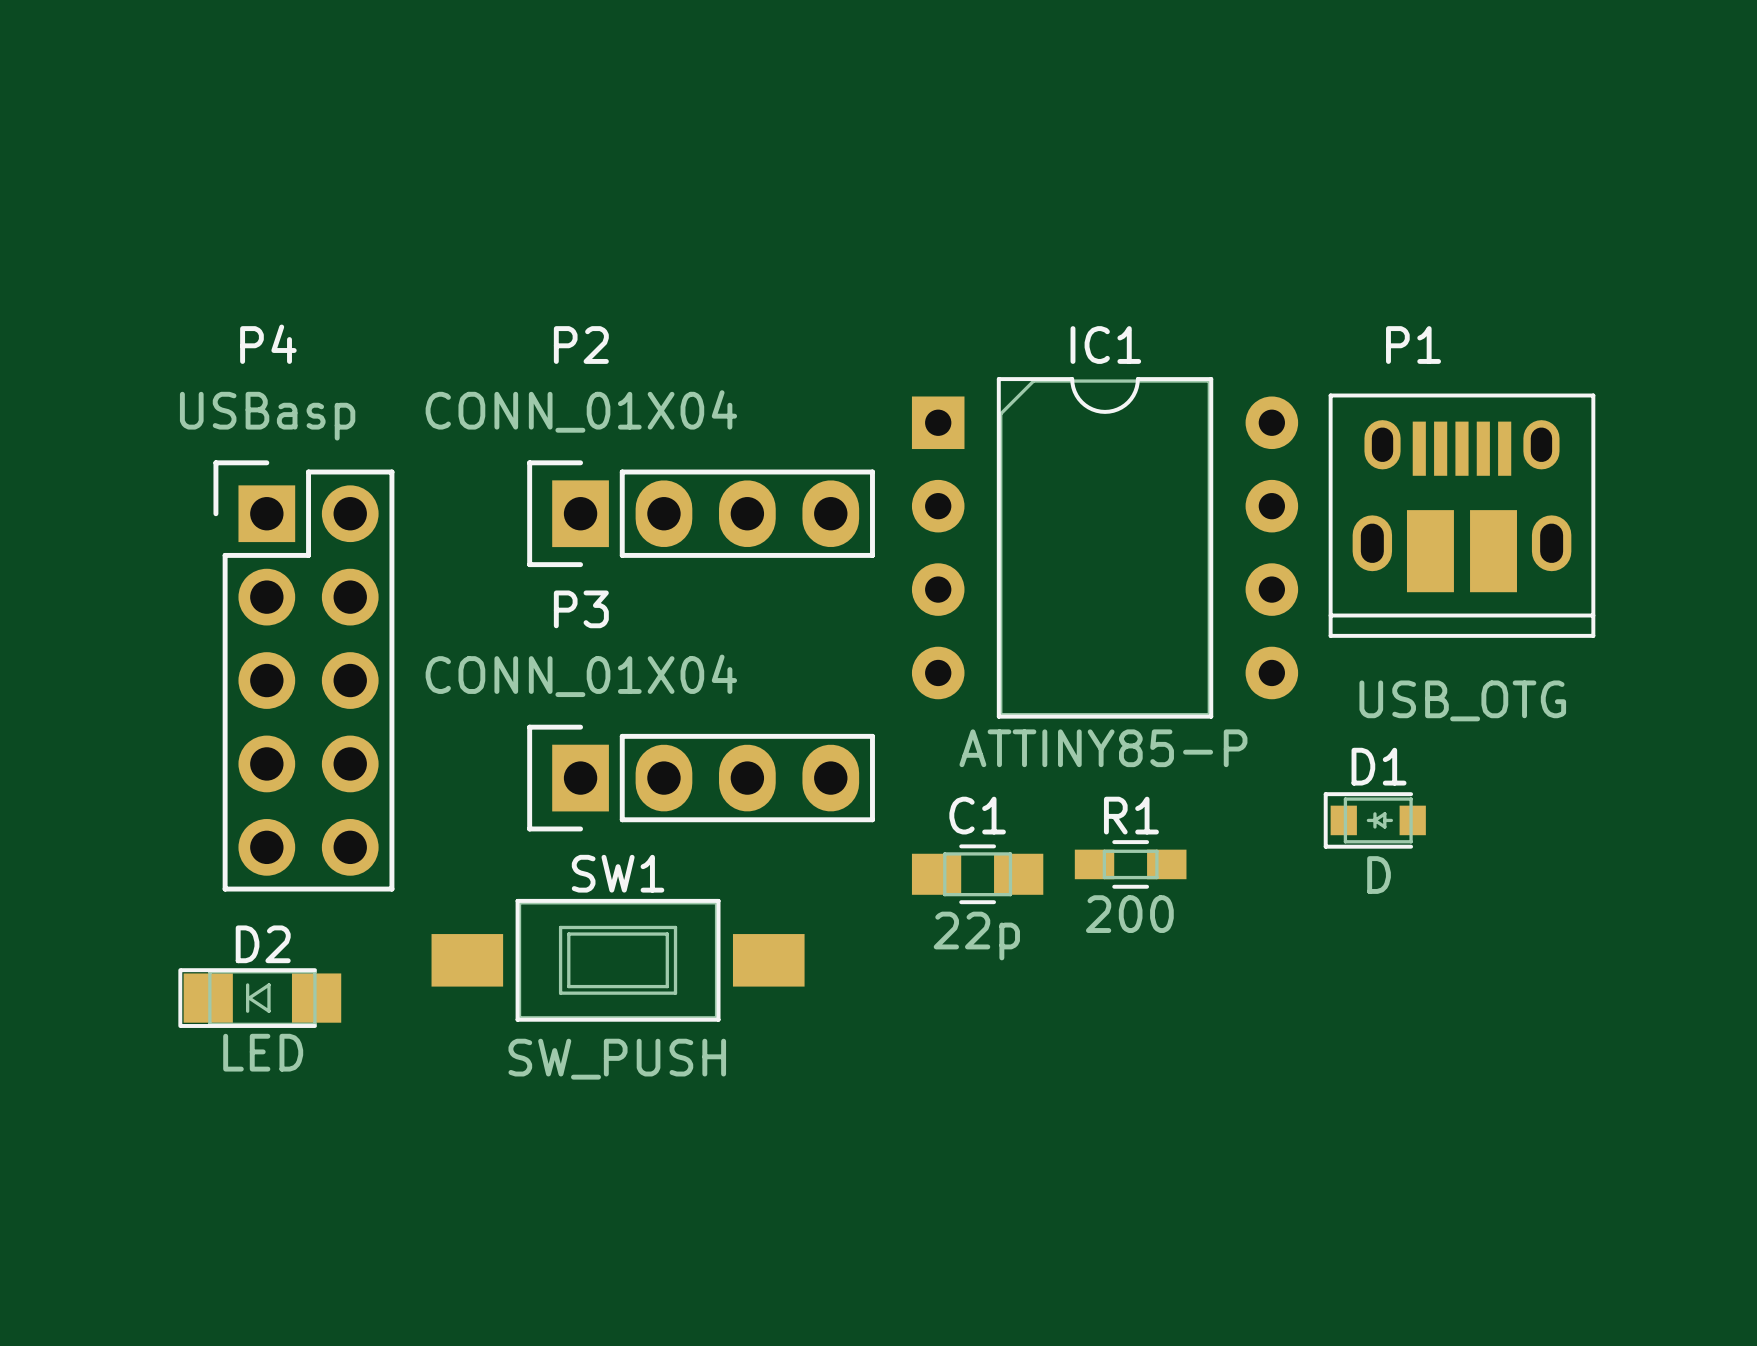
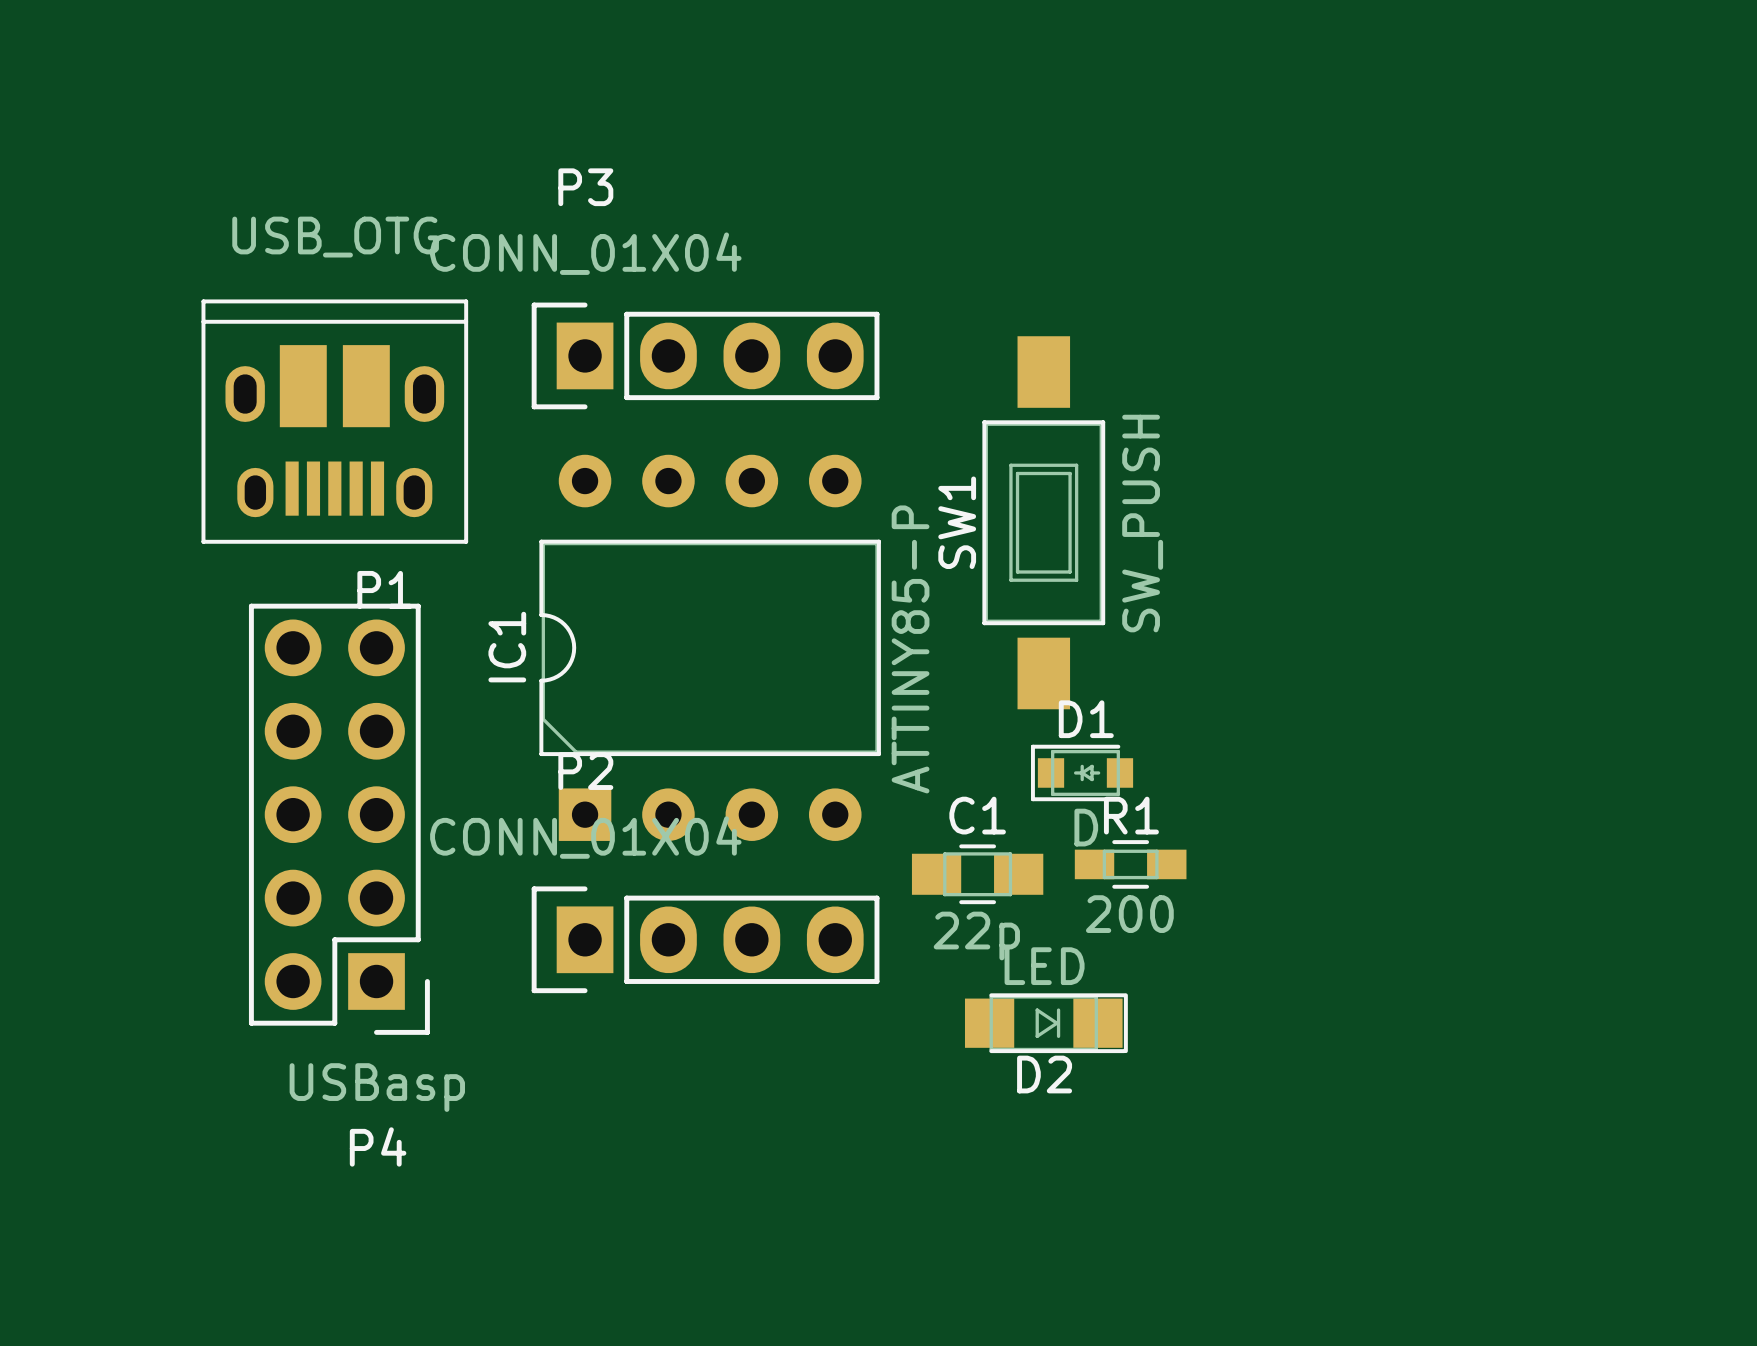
P2 position: (701, 513) -> (705, 939)
P1 rotation: 0° (1461, 515) -> 180° (334, 421)
P1 position: (1461, 515) -> (334, 421)
IC1 rotation: 0° (1105, 547) -> 90° counterclockwise (710, 647)
IC1 position: (1105, 547) -> (710, 647)
P4 rotation: 0° (303, 675) -> 180° (339, 819)
P3 position: (701, 778) -> (705, 355)
D1 position: (1374, 820) -> (1082, 772)
SW1 name position: SW1 (618, 873) -> SW1 (957, 522)
SW1 rotation: 0° (618, 960) -> 90° clockwise (1043, 522)
SW1 position: (618, 960) -> (1043, 522)
D2 rotation: 0° (259, 998) -> 180° (1046, 1023)
D2 position: (259, 998) -> (1046, 1023)
SW1 value position: SW_PUSH (617, 1059) -> SW_PUSH (1142, 523)

